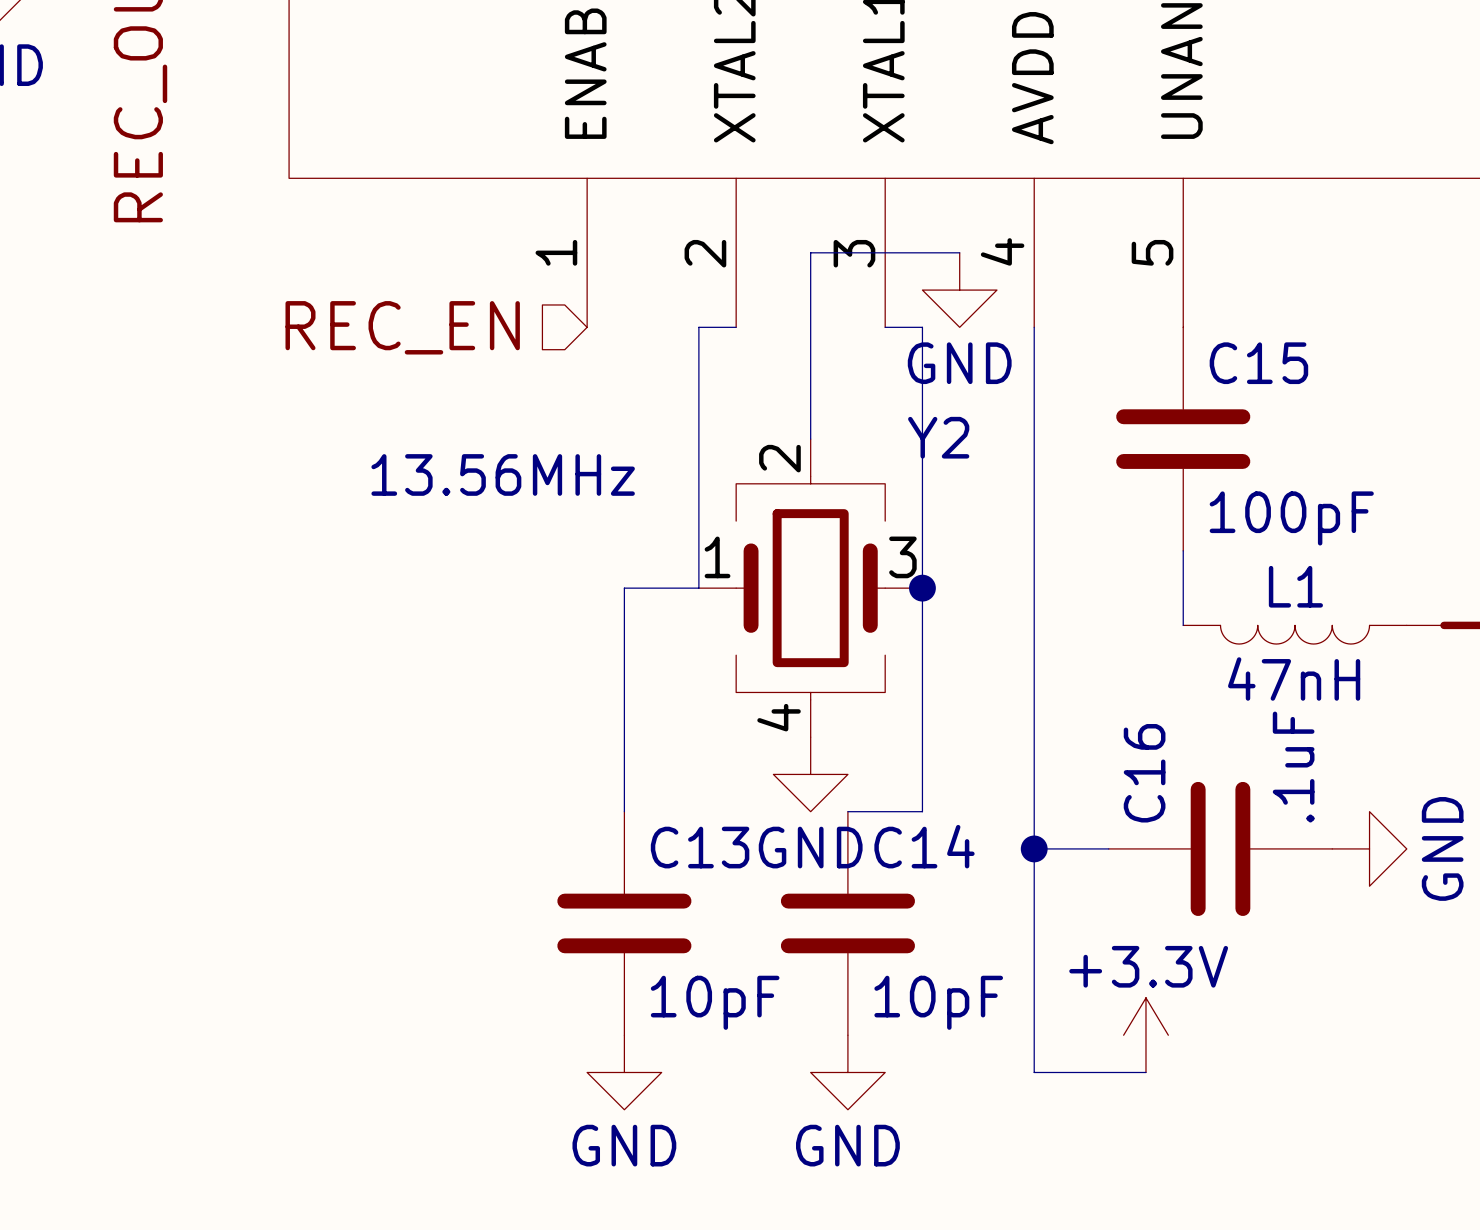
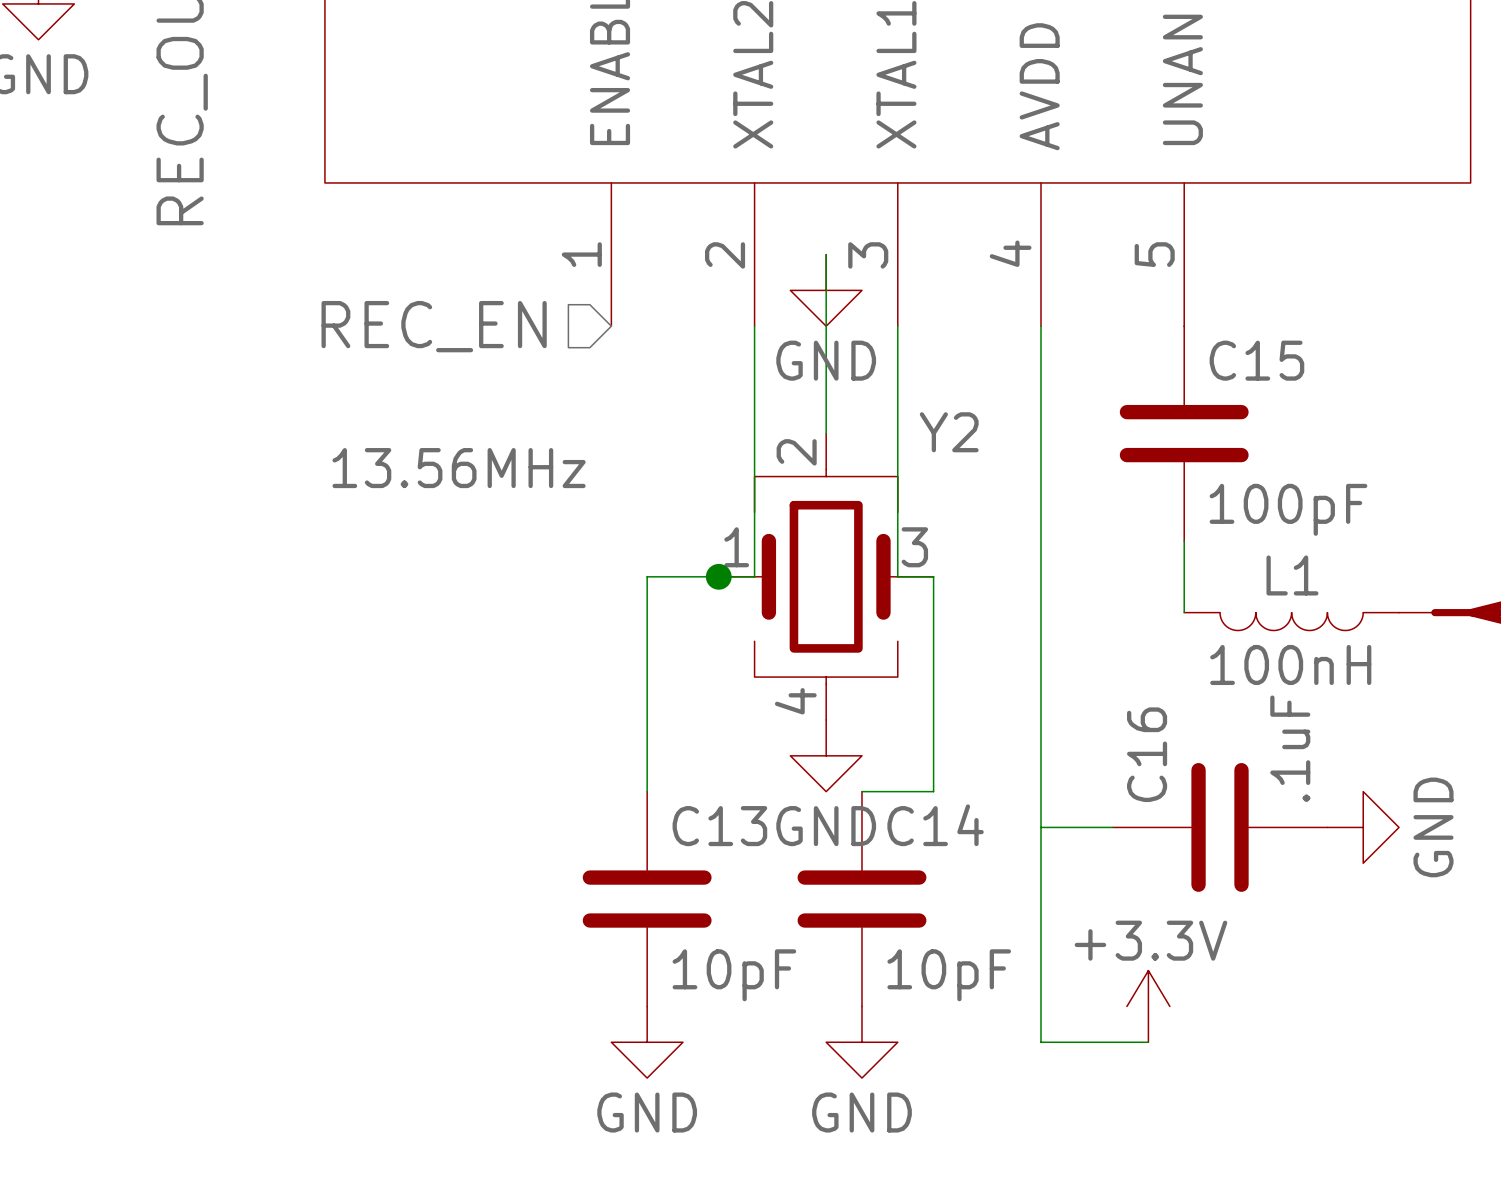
wire: (810, 252) (959, 252) -> none
power symbol position: GND (959, 290) -> GND (826, 290)
wire: (736, 327) (698, 327) (698, 588) -> (754, 326) (754, 576) (718, 576)
wire: (885, 327) (922, 327) (922, 588) -> (897, 326) (897, 576) (933, 576)
Y2 value position: 13.56MHz (503, 474) -> 13.56MHz (459, 468)
junction: none -> (718, 576)
junction: (922, 588) -> none
L1 value: 47nH (1294, 679) -> 100nH (1290, 664)
junction: (1034, 848) -> none

